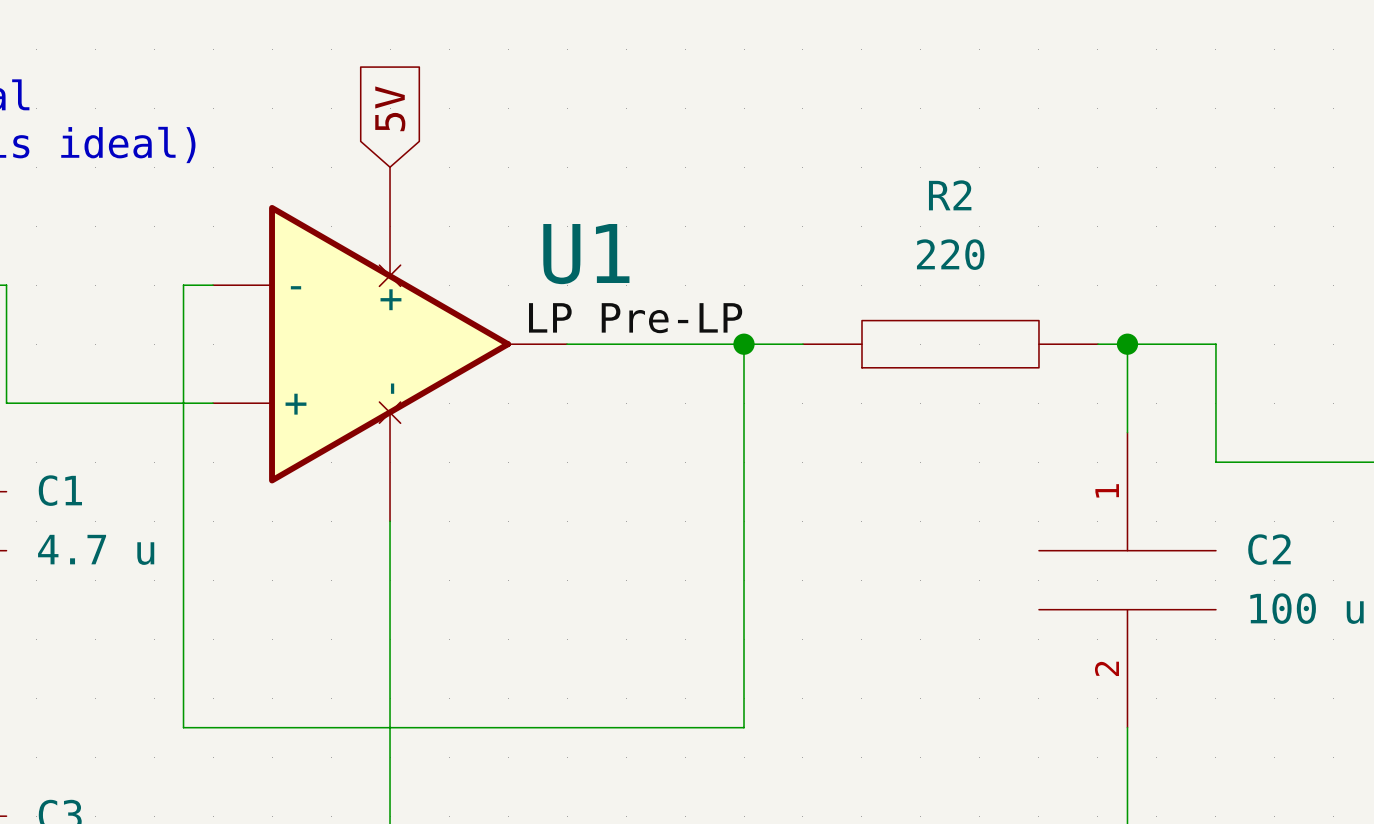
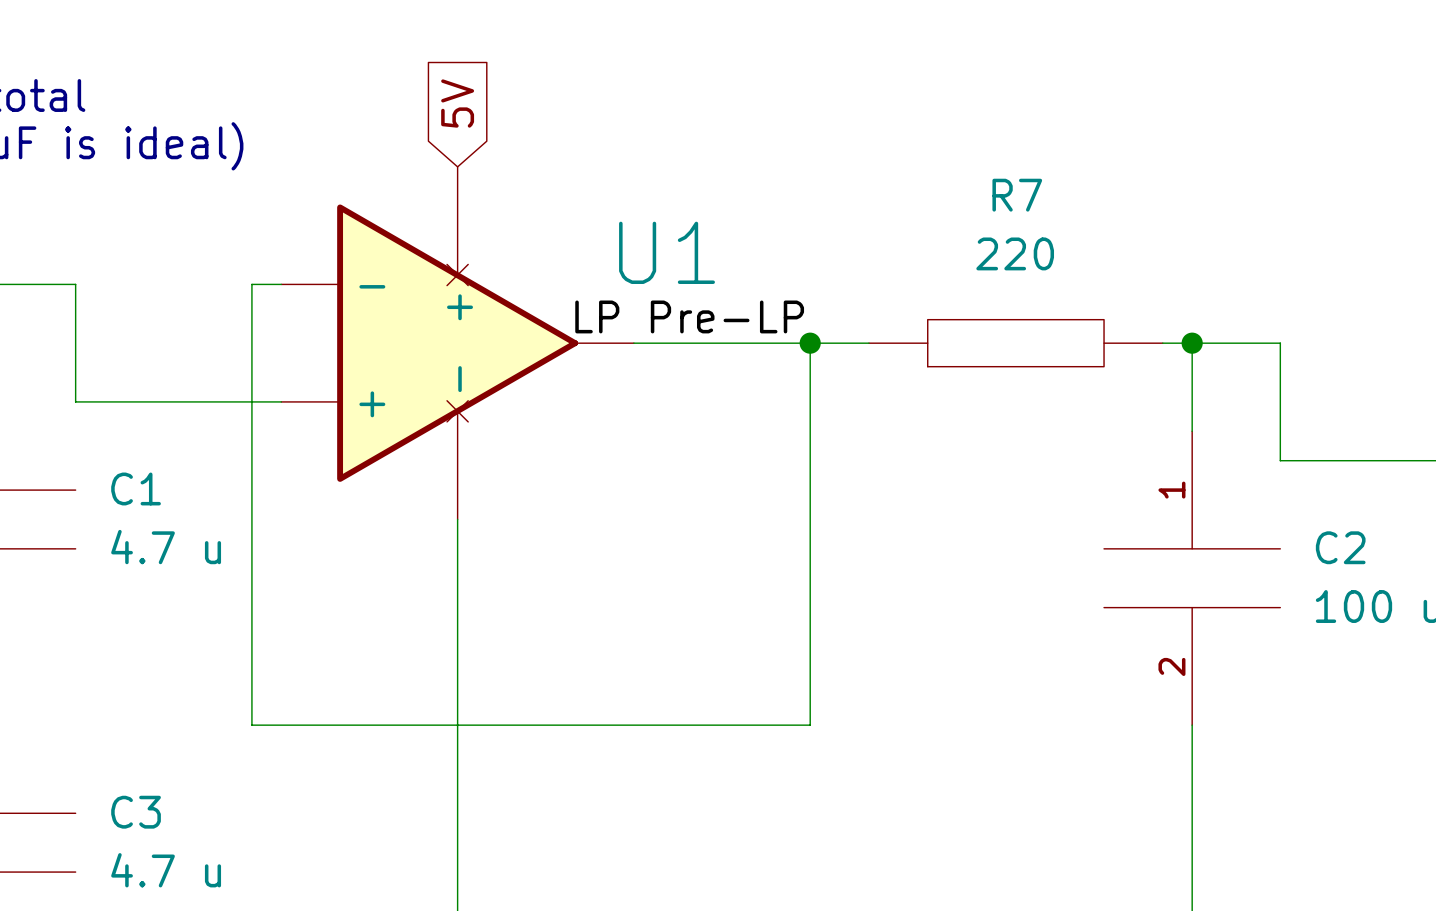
R2 name: R2 (950, 195) -> R7 (1017, 195)

